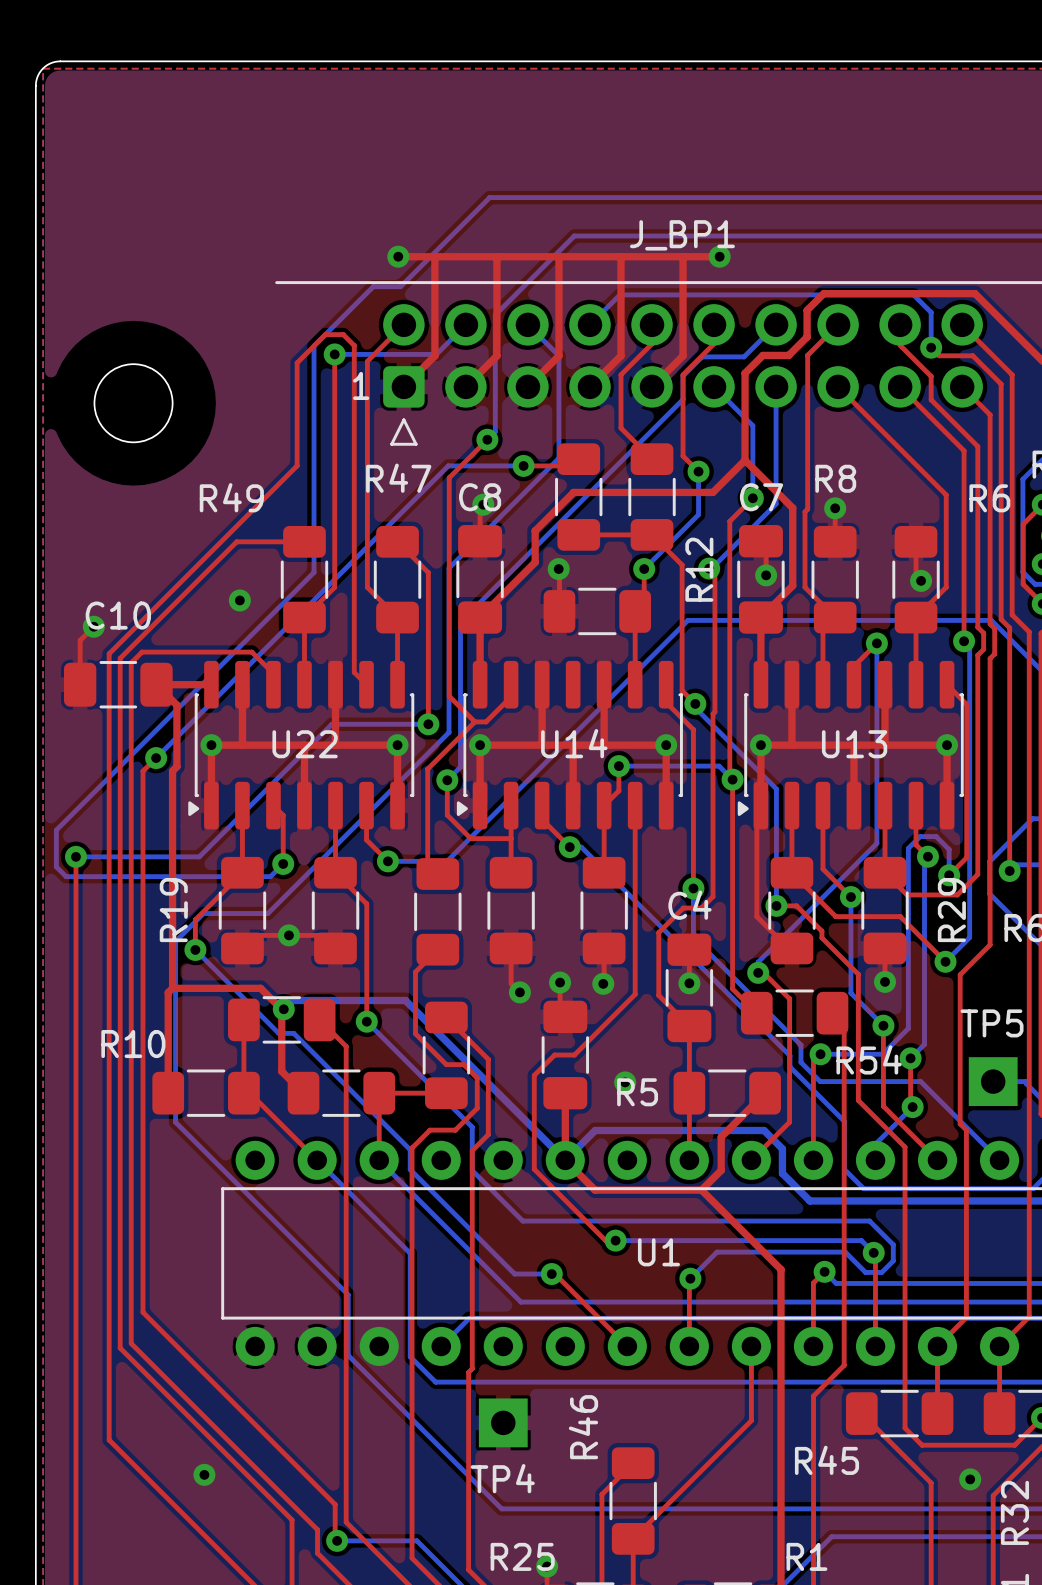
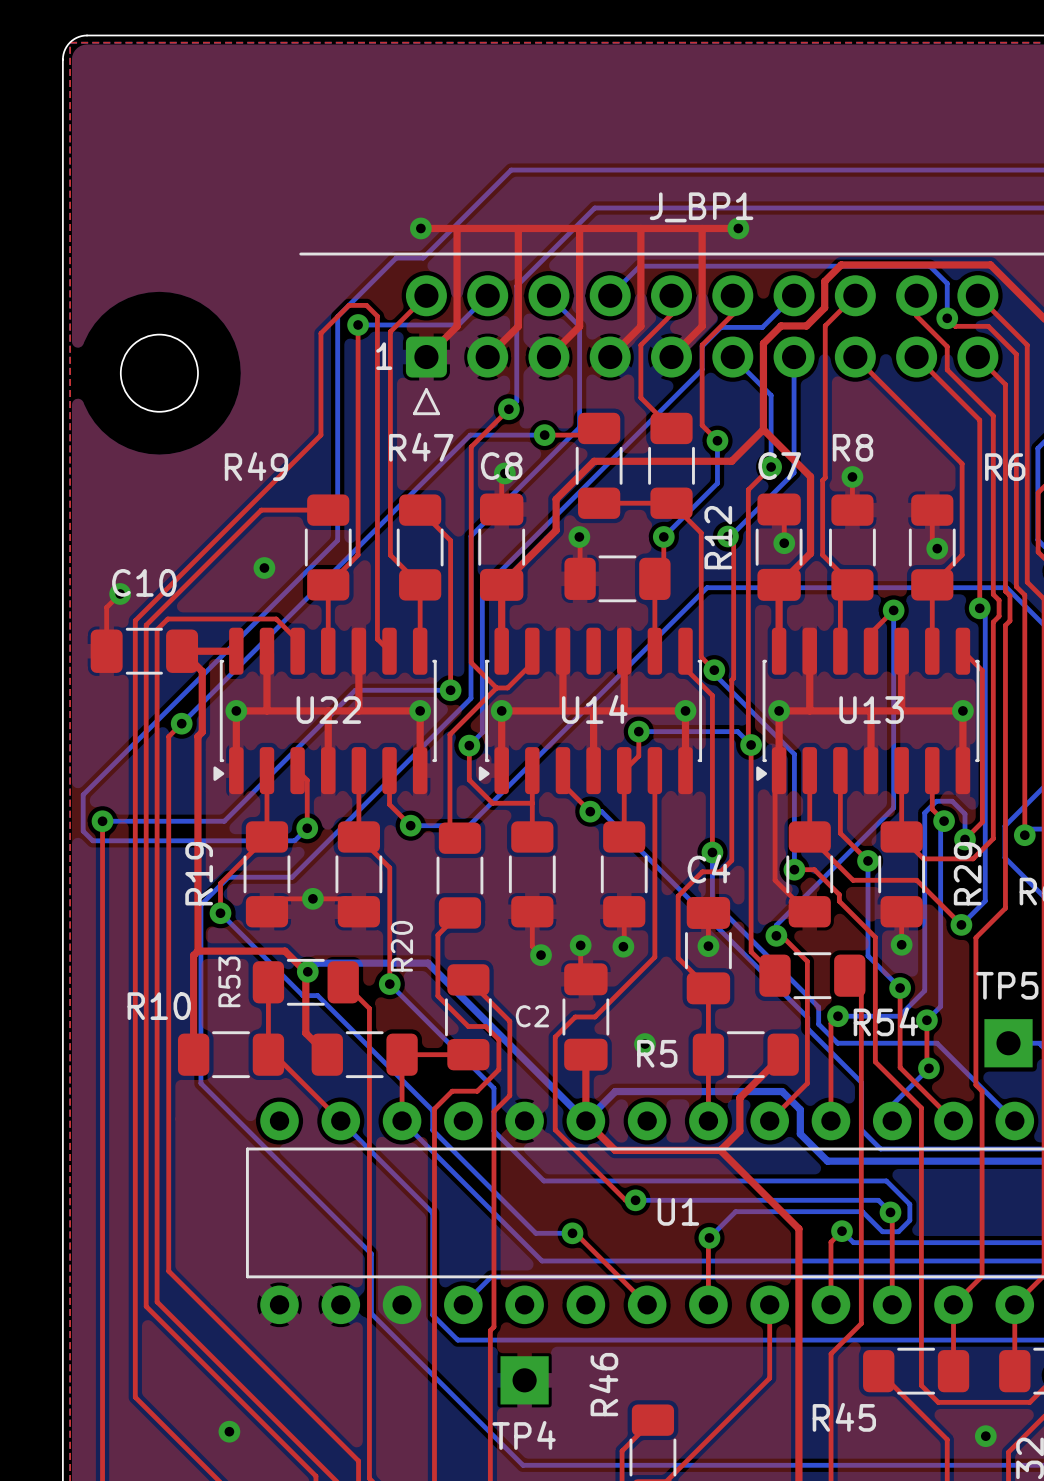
R20 name: none -> R20 (401, 946)
R53 name: none -> R53 (229, 981)
C2 name: none -> C2 (532, 1016)

